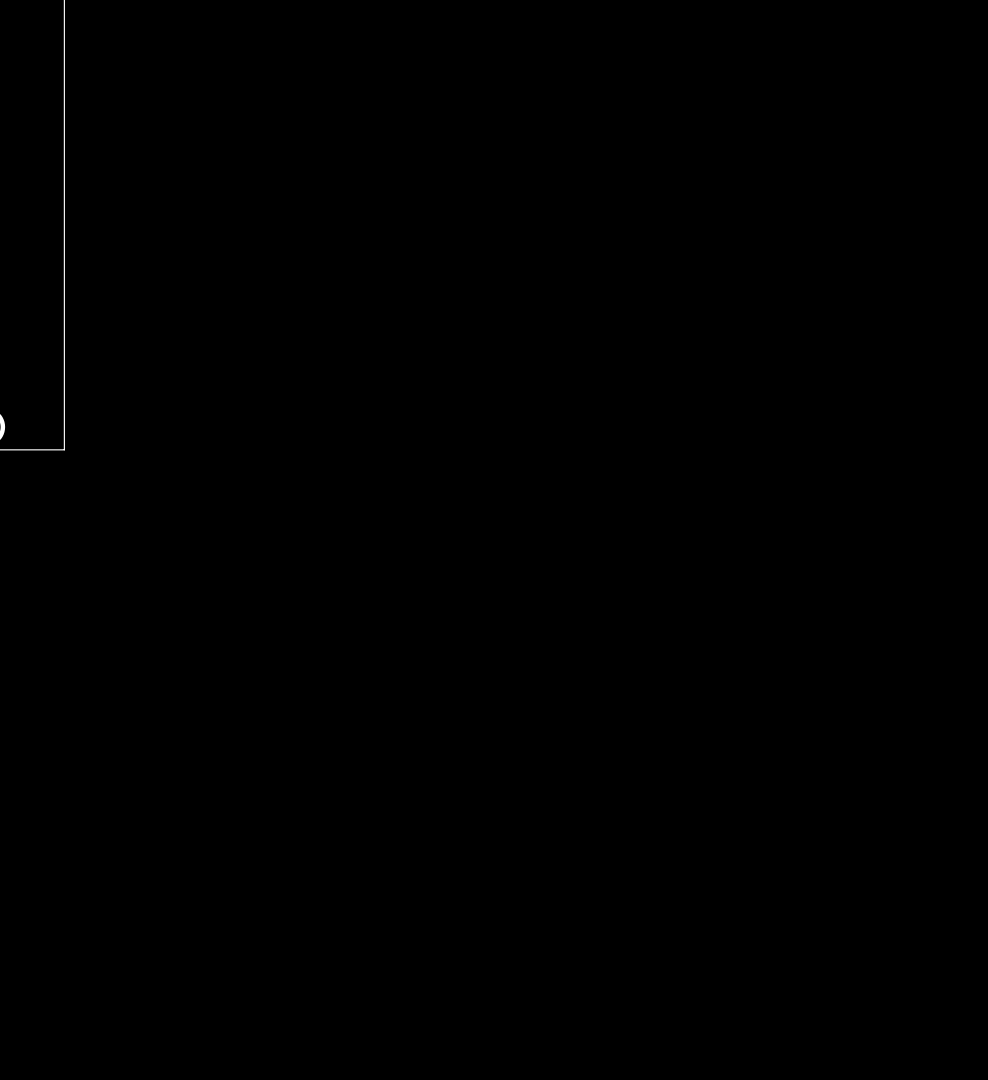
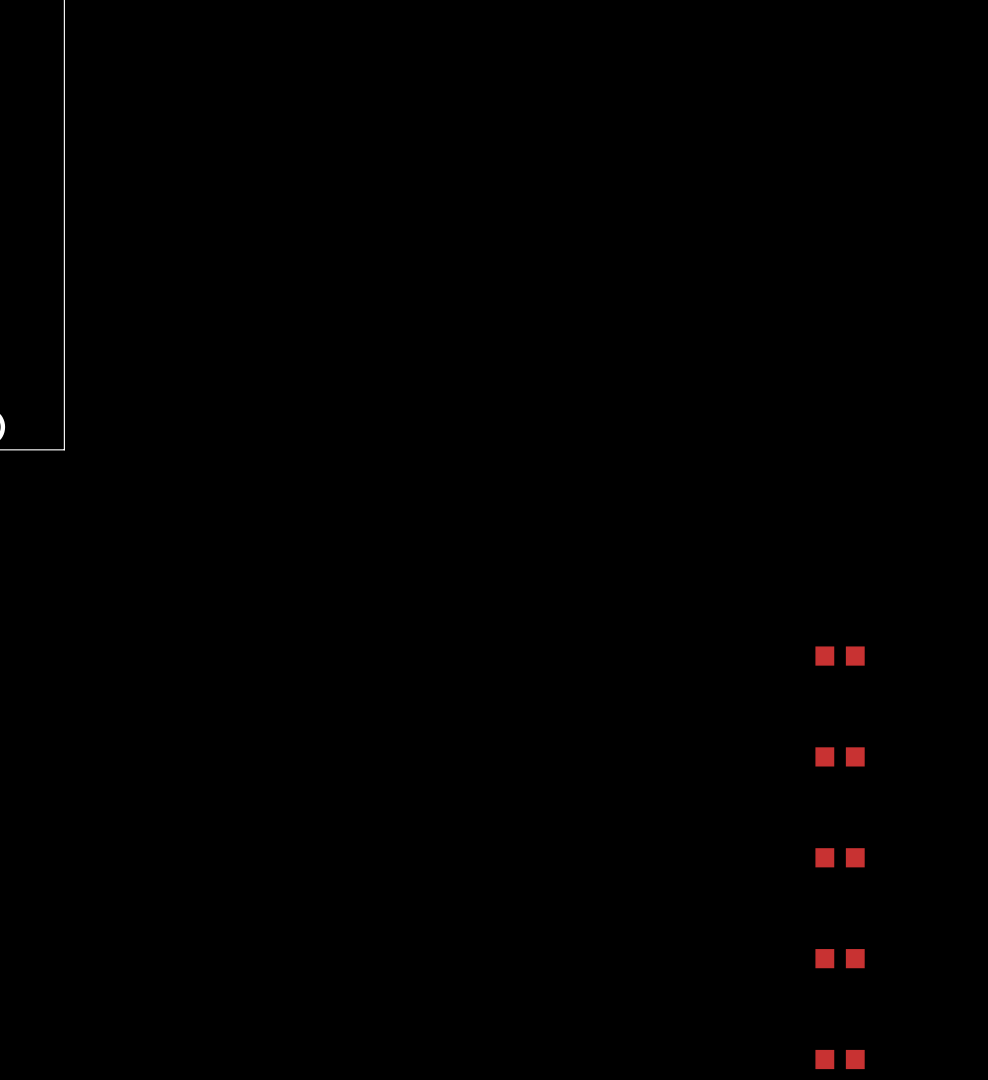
part: none -> (840, 656)
part: none -> (840, 756)
part: none -> (840, 857)
part: none -> (840, 958)
part: none -> (840, 1059)

